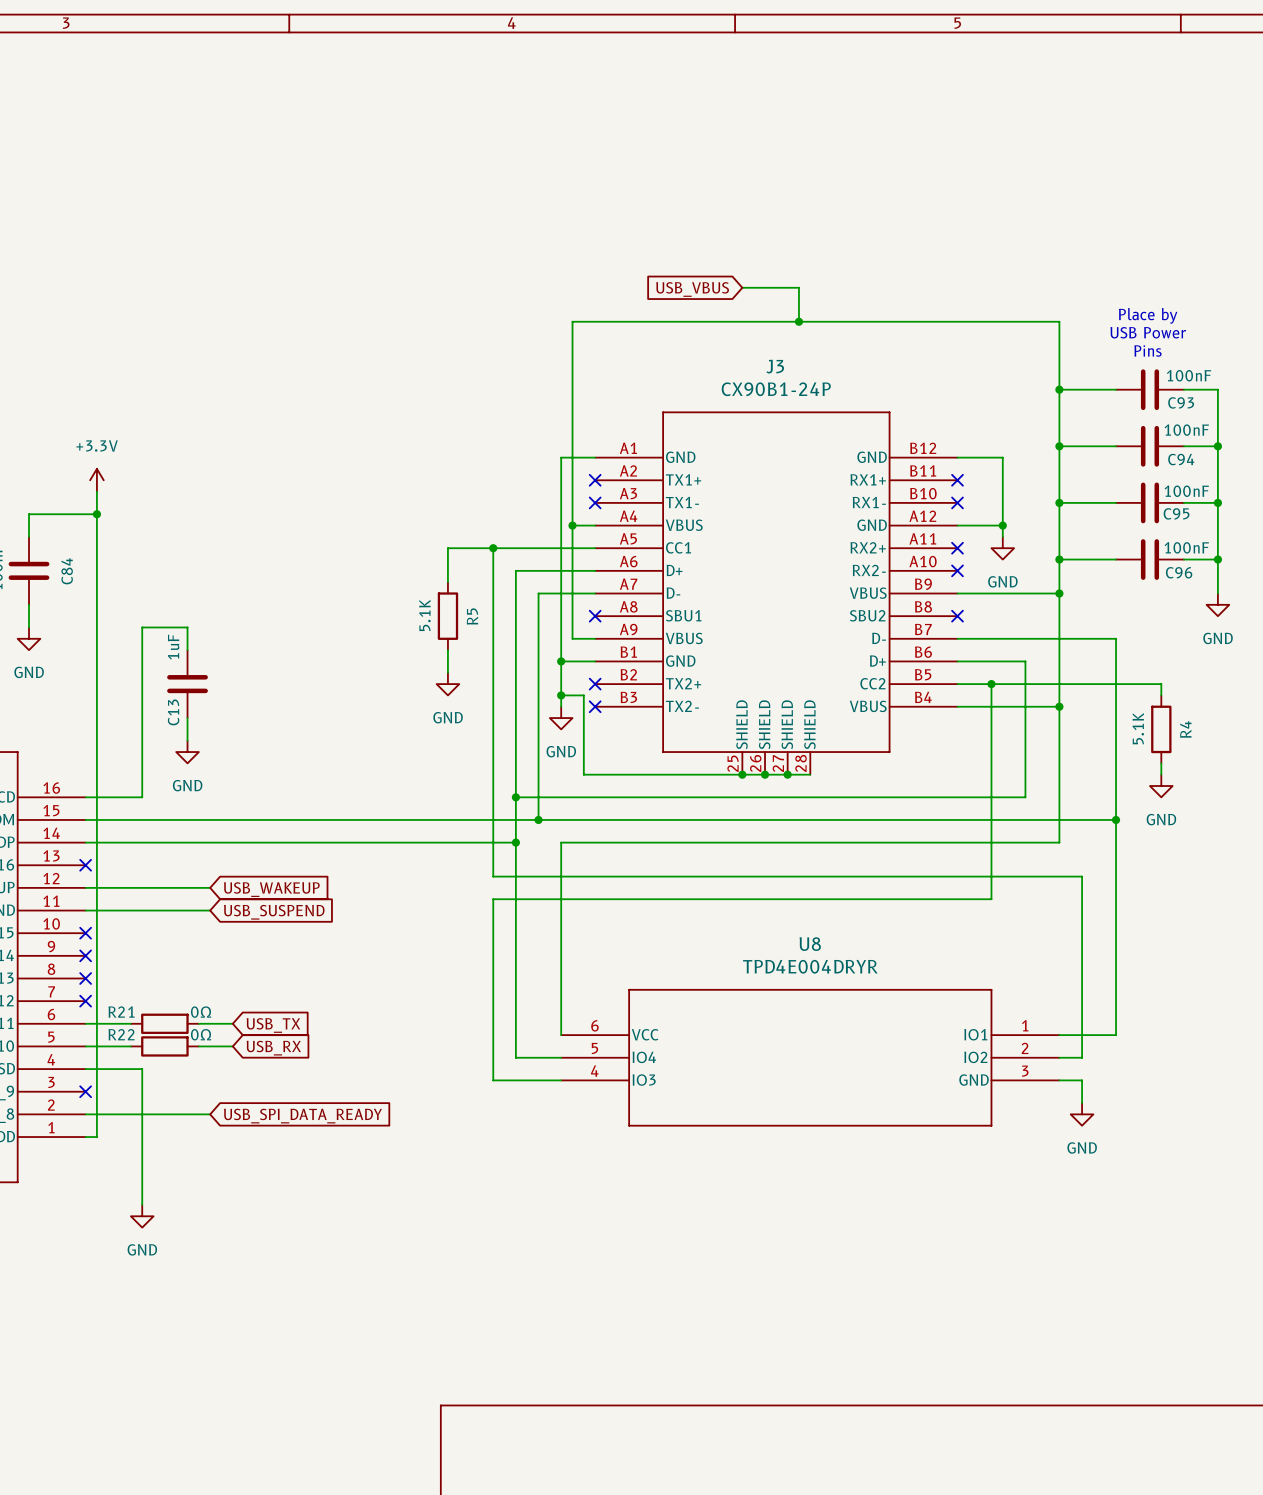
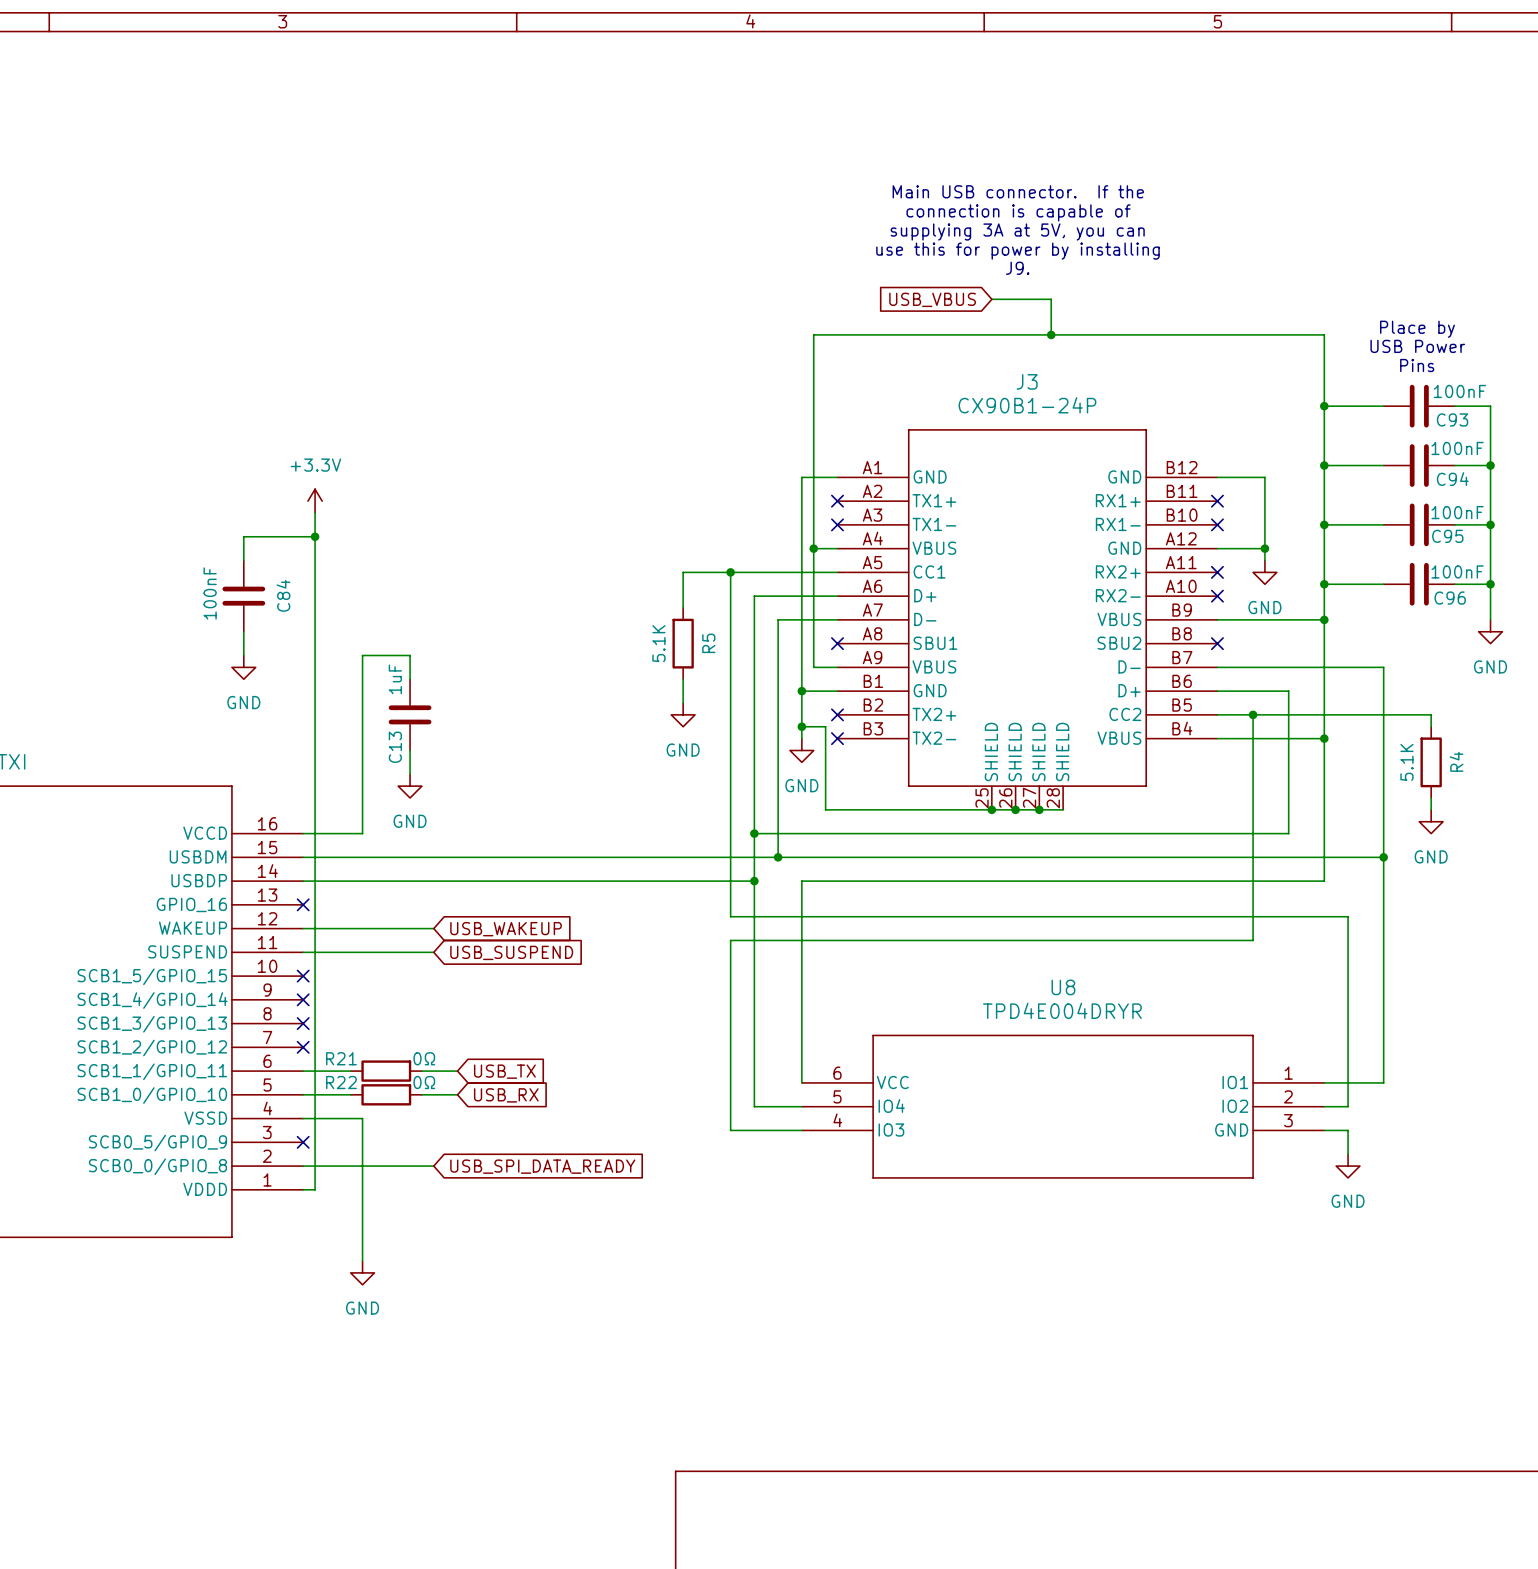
text: none -> Main USB connector. If the (1018, 191)
text: none -> connection is capable of (1018, 212)
text: none -> supplying 3A at 5V, you can (1017, 232)
text: none -> use this for power by installing (1017, 251)
text: none -> J9. (1017, 268)

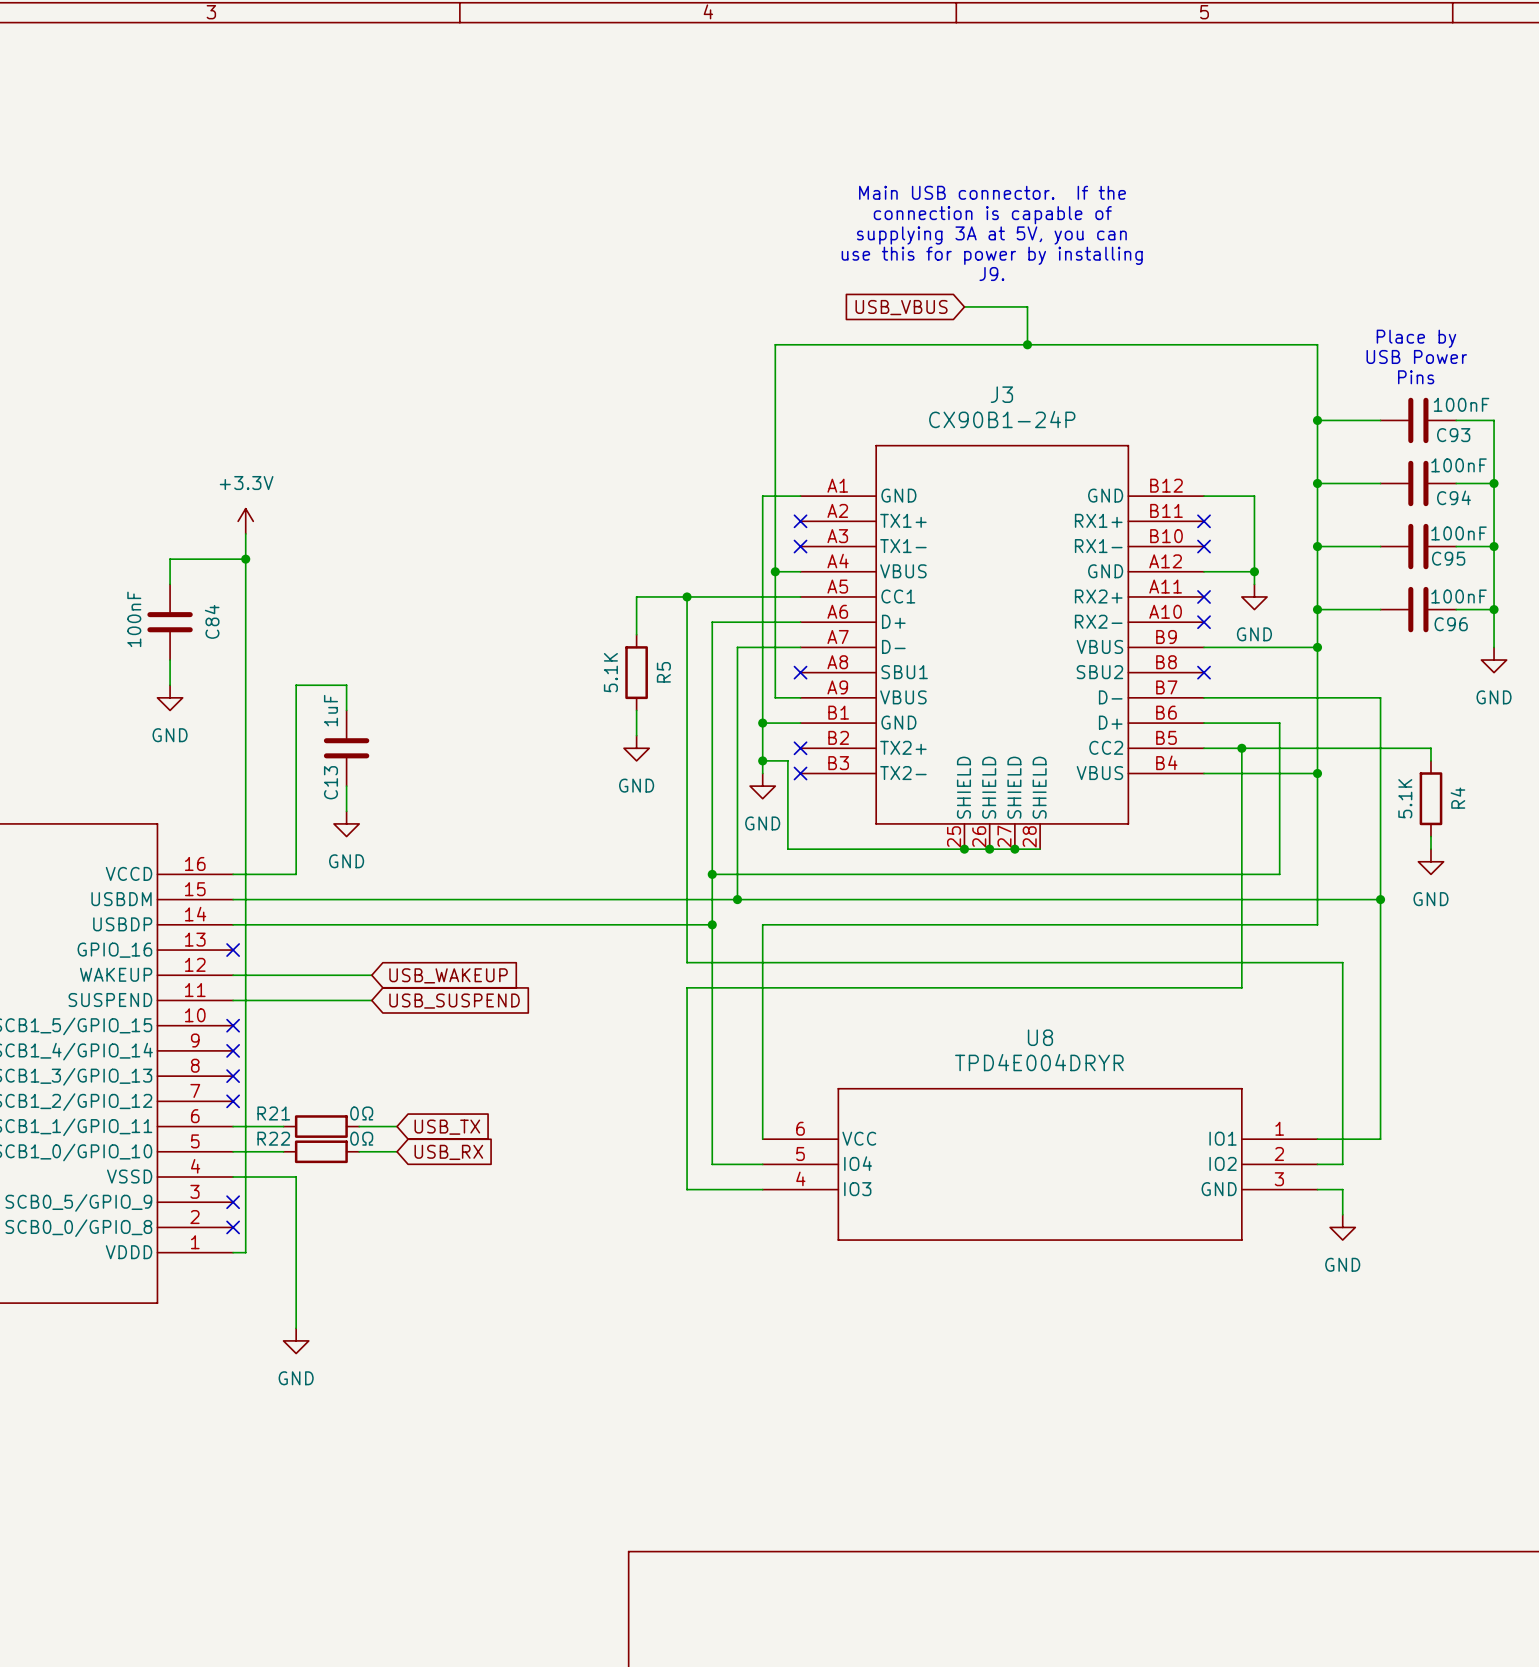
wire: (303, 1166) (433, 1166) -> none
no-connect mark: none -> (233, 1227)
global label: USB_SPI_DATA_READY (542, 1166) -> none

